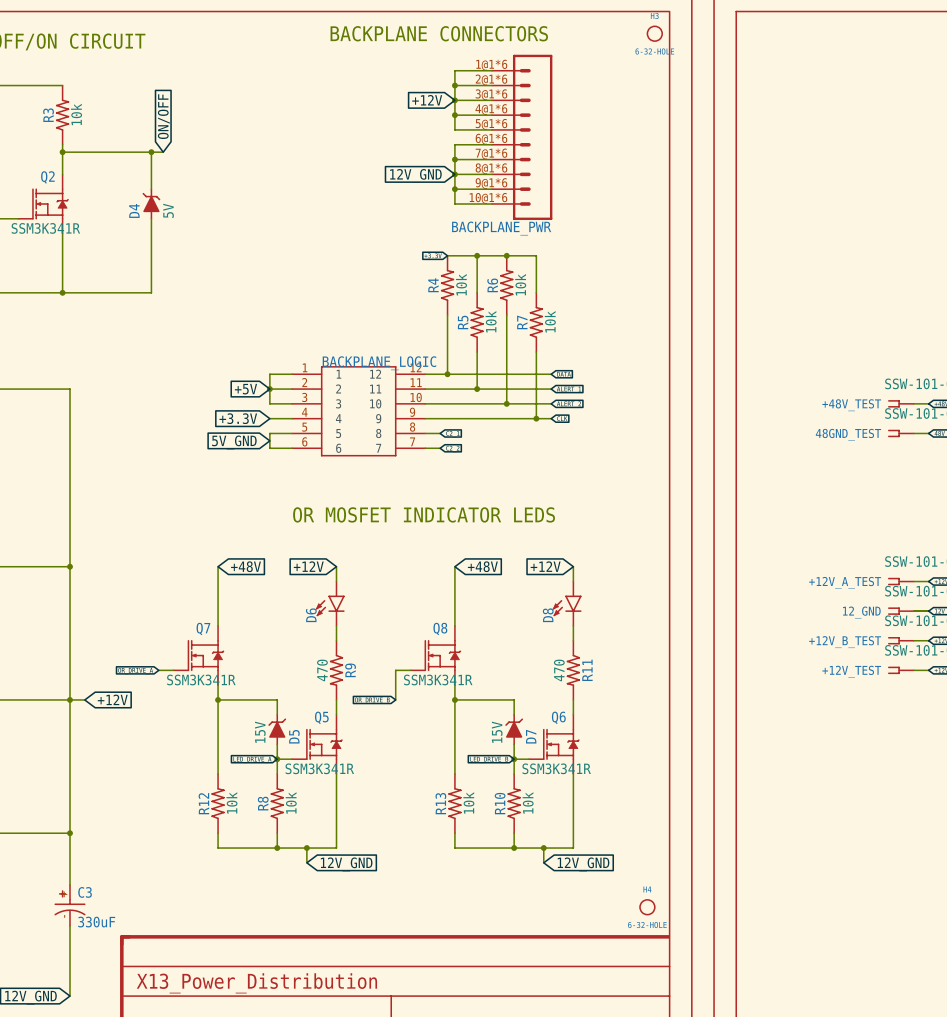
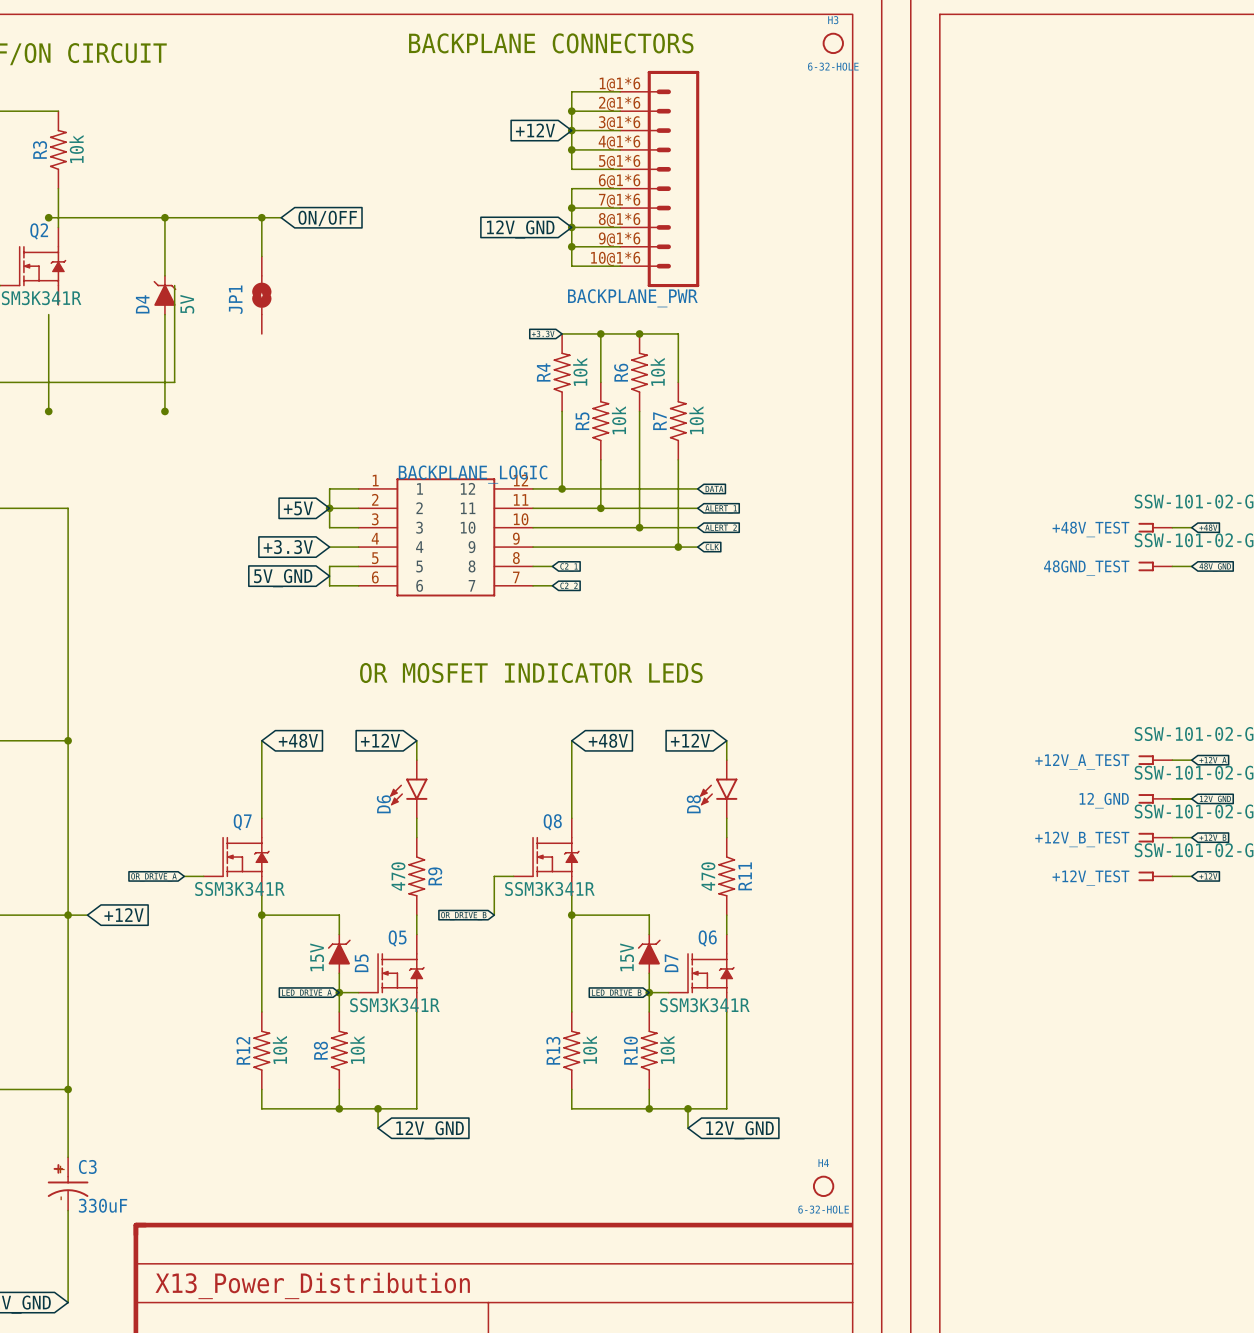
global label rotation: 0° (163, 116) -> 90° clockwise (327, 218)
global label position: ON/OFF (163, 116) -> ON/OFF (327, 218)
wire: (62, 152) (163, 152) -> none
junction position: (62, 152) -> (48, 217)
wire: (151, 152) (151, 189) -> none
junction position: (151, 152) -> (164, 217)
wire: none -> (48, 217) (281, 217)
wire: none -> (164, 217) (164, 275)
wire: none -> (261, 217) (261, 256)
junction: none -> (261, 217)
D4 position: (151, 203) -> (164, 295)
JP1: none -> (261, 295)
wire: (62, 233) (62, 292) -> none
wire: none -> (48, 314) (48, 411)
wire: none -> (164, 314) (164, 411)
junction position: (62, 292) -> (48, 411)
junction: none -> (164, 411)

